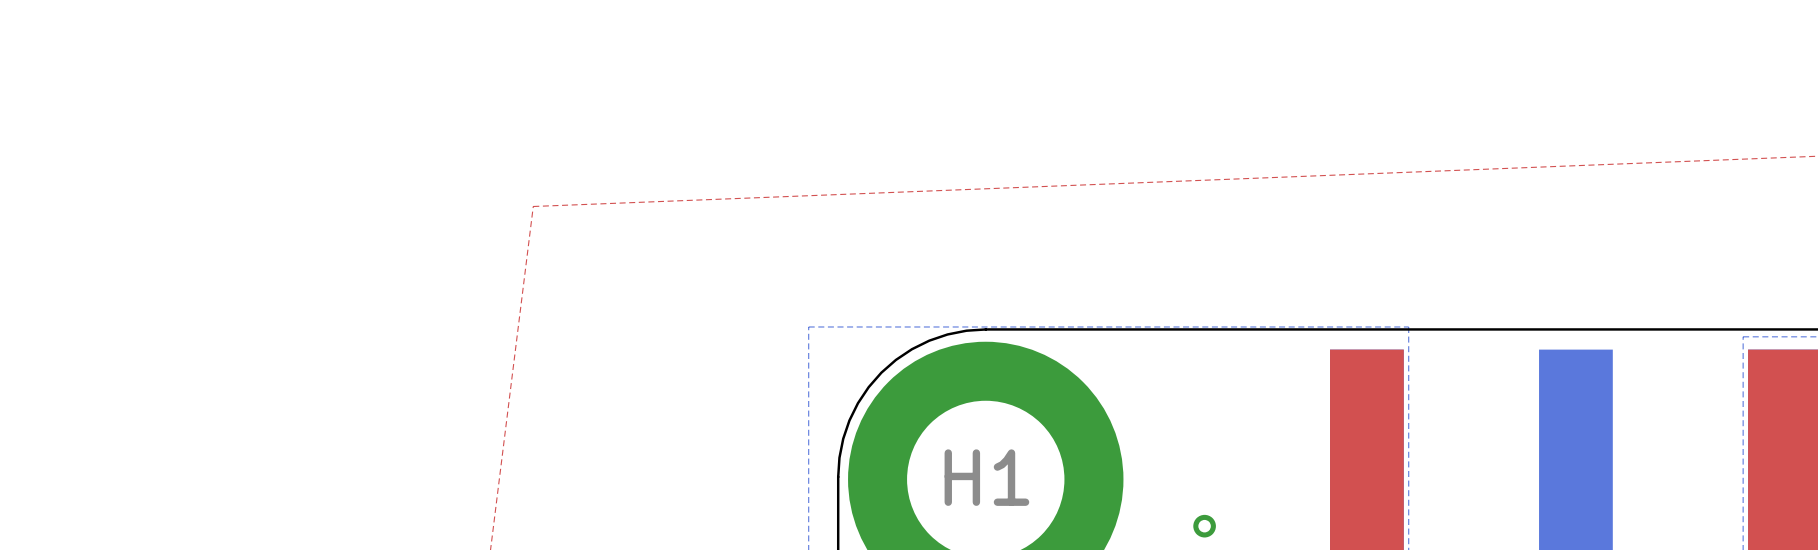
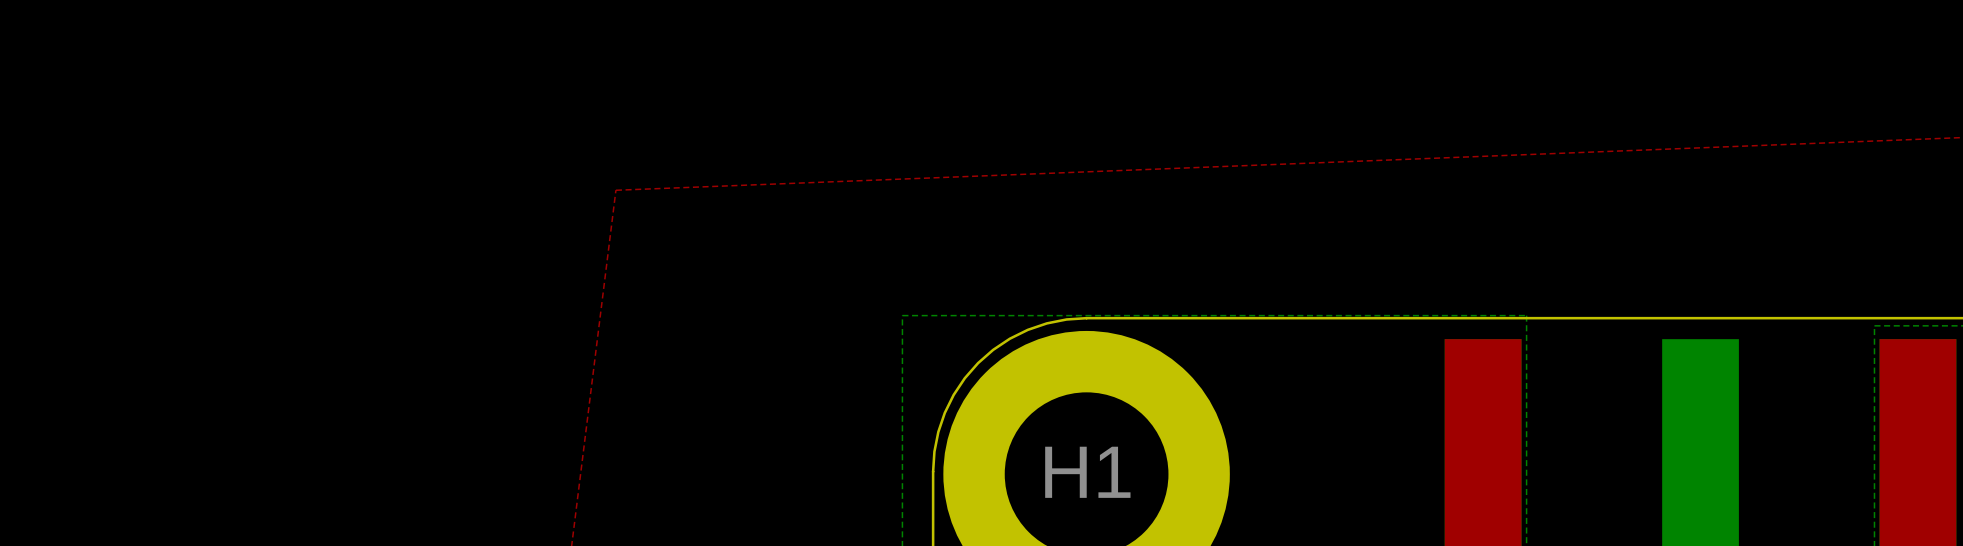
via: (1204, 526) -> none

